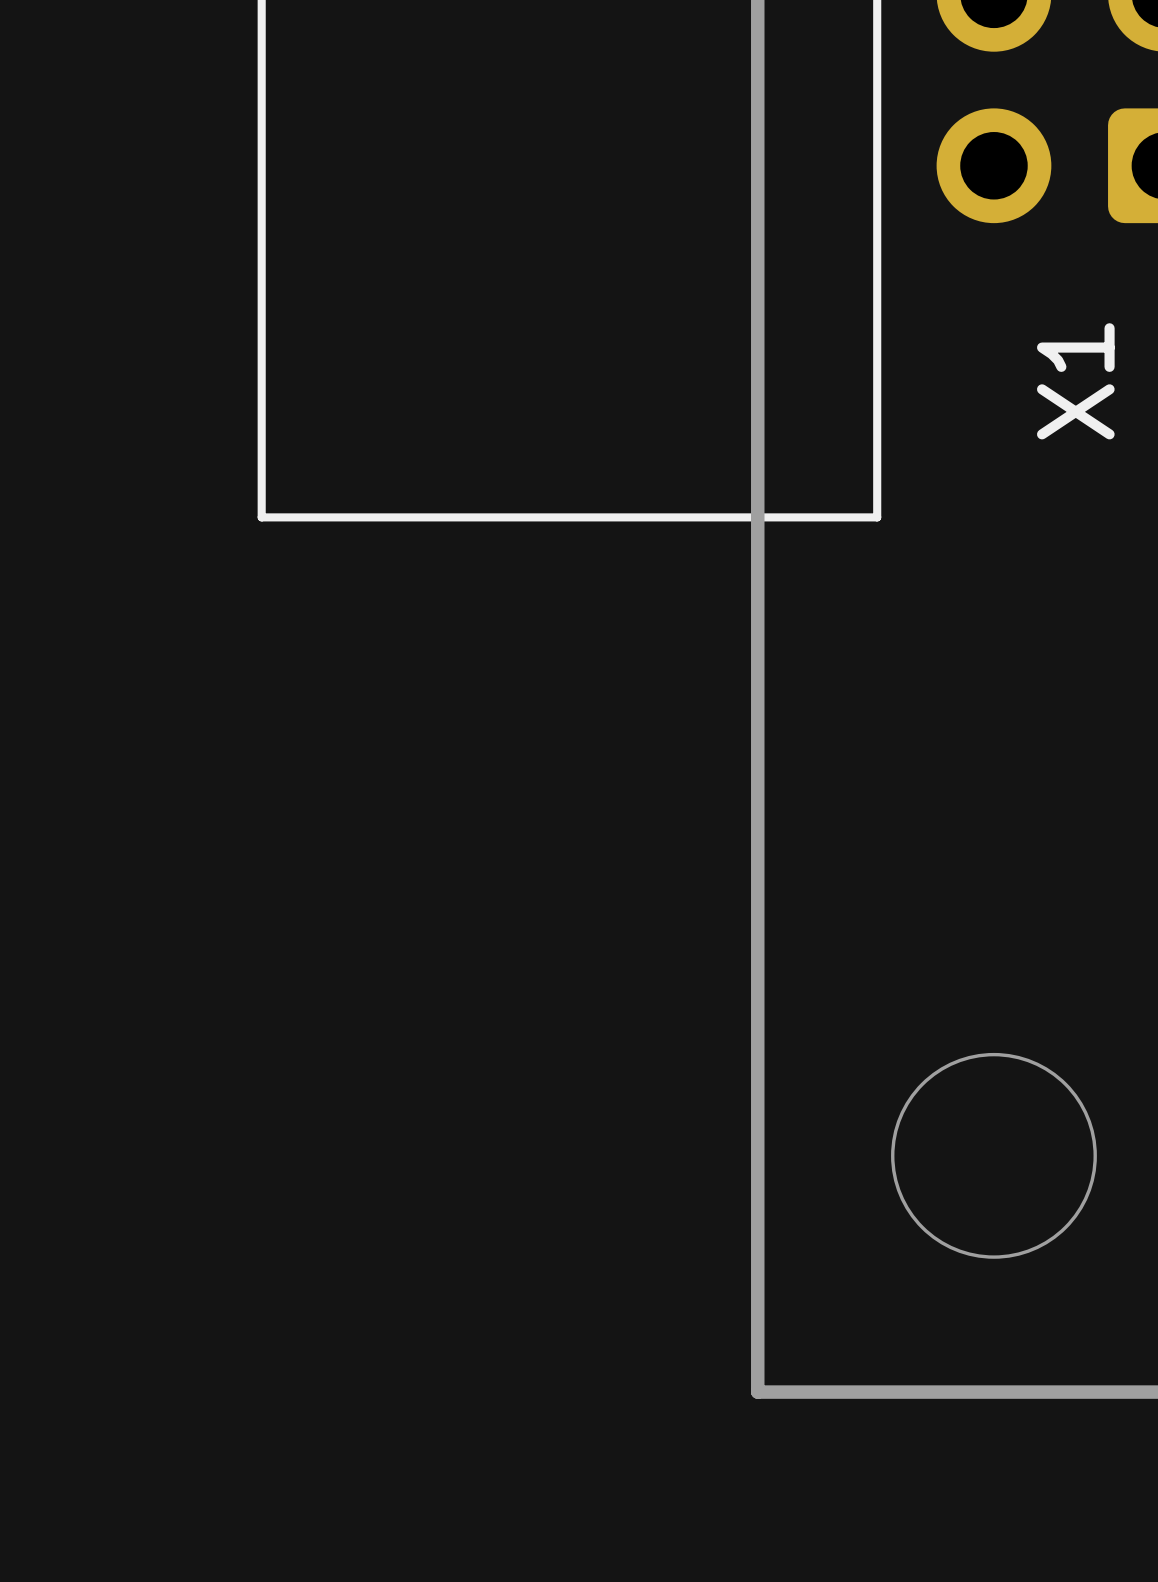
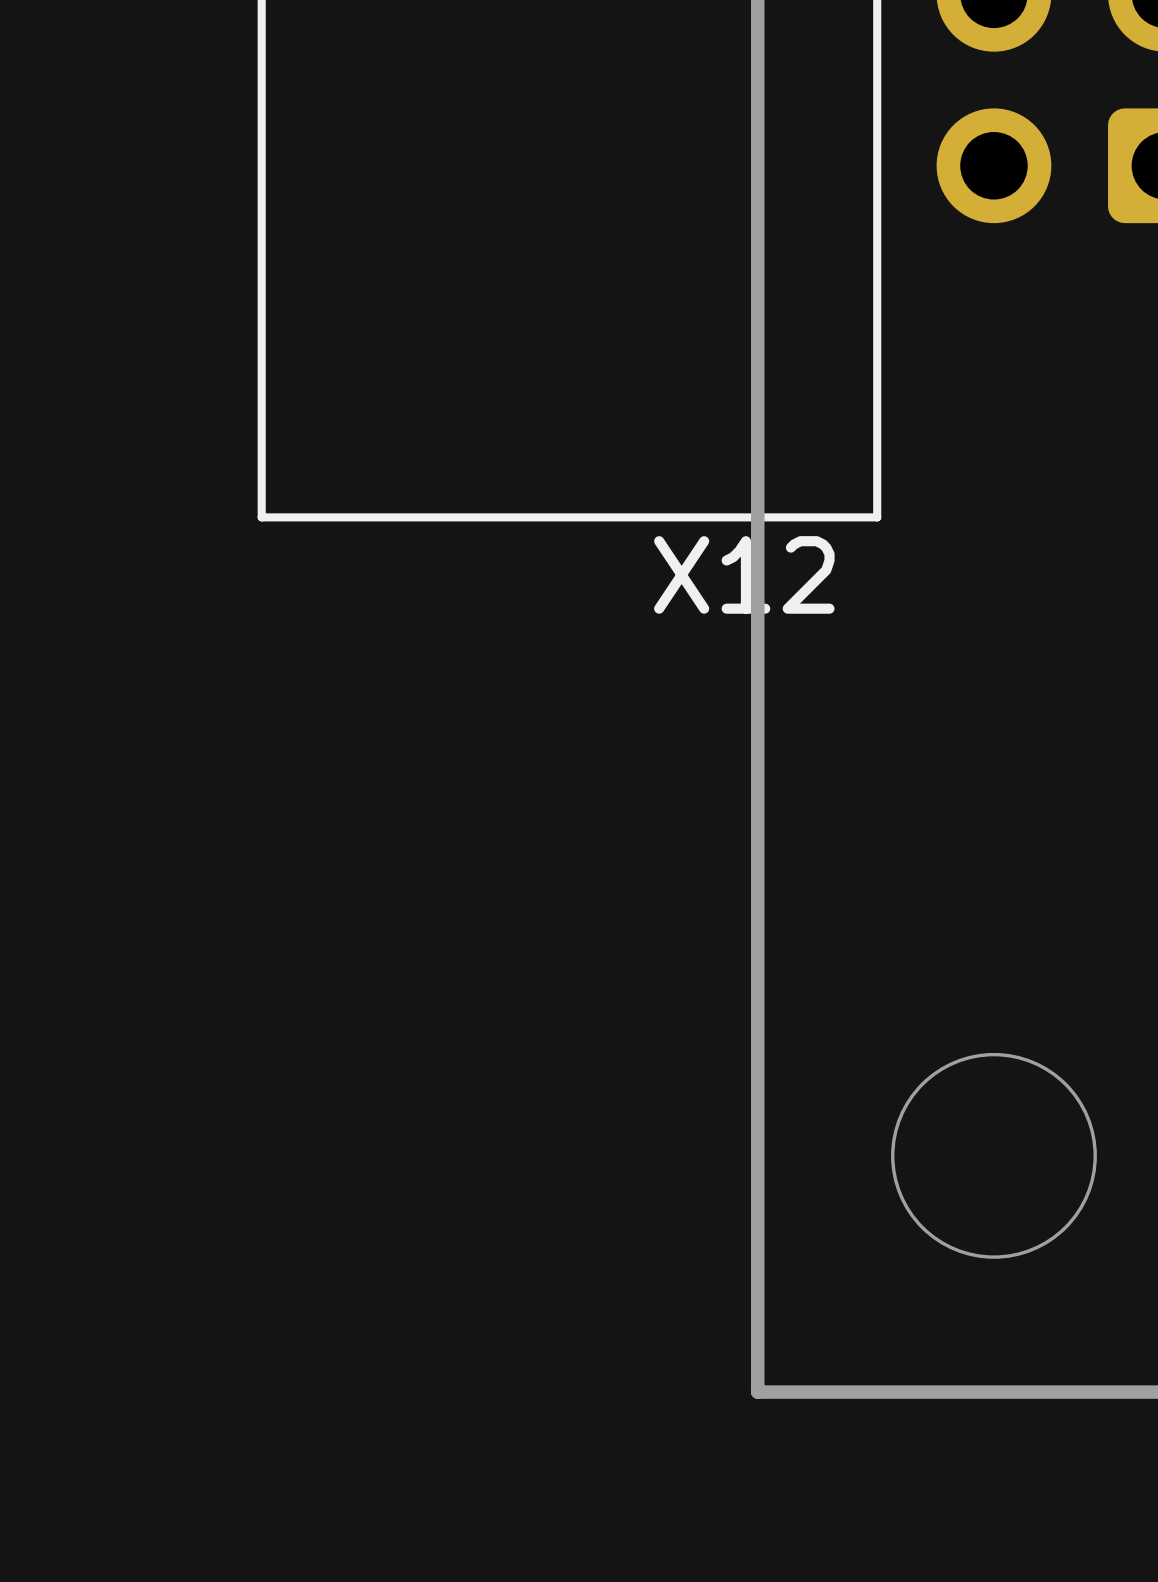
X1 name: X1 (1075, 381) -> X12 (744, 574)

